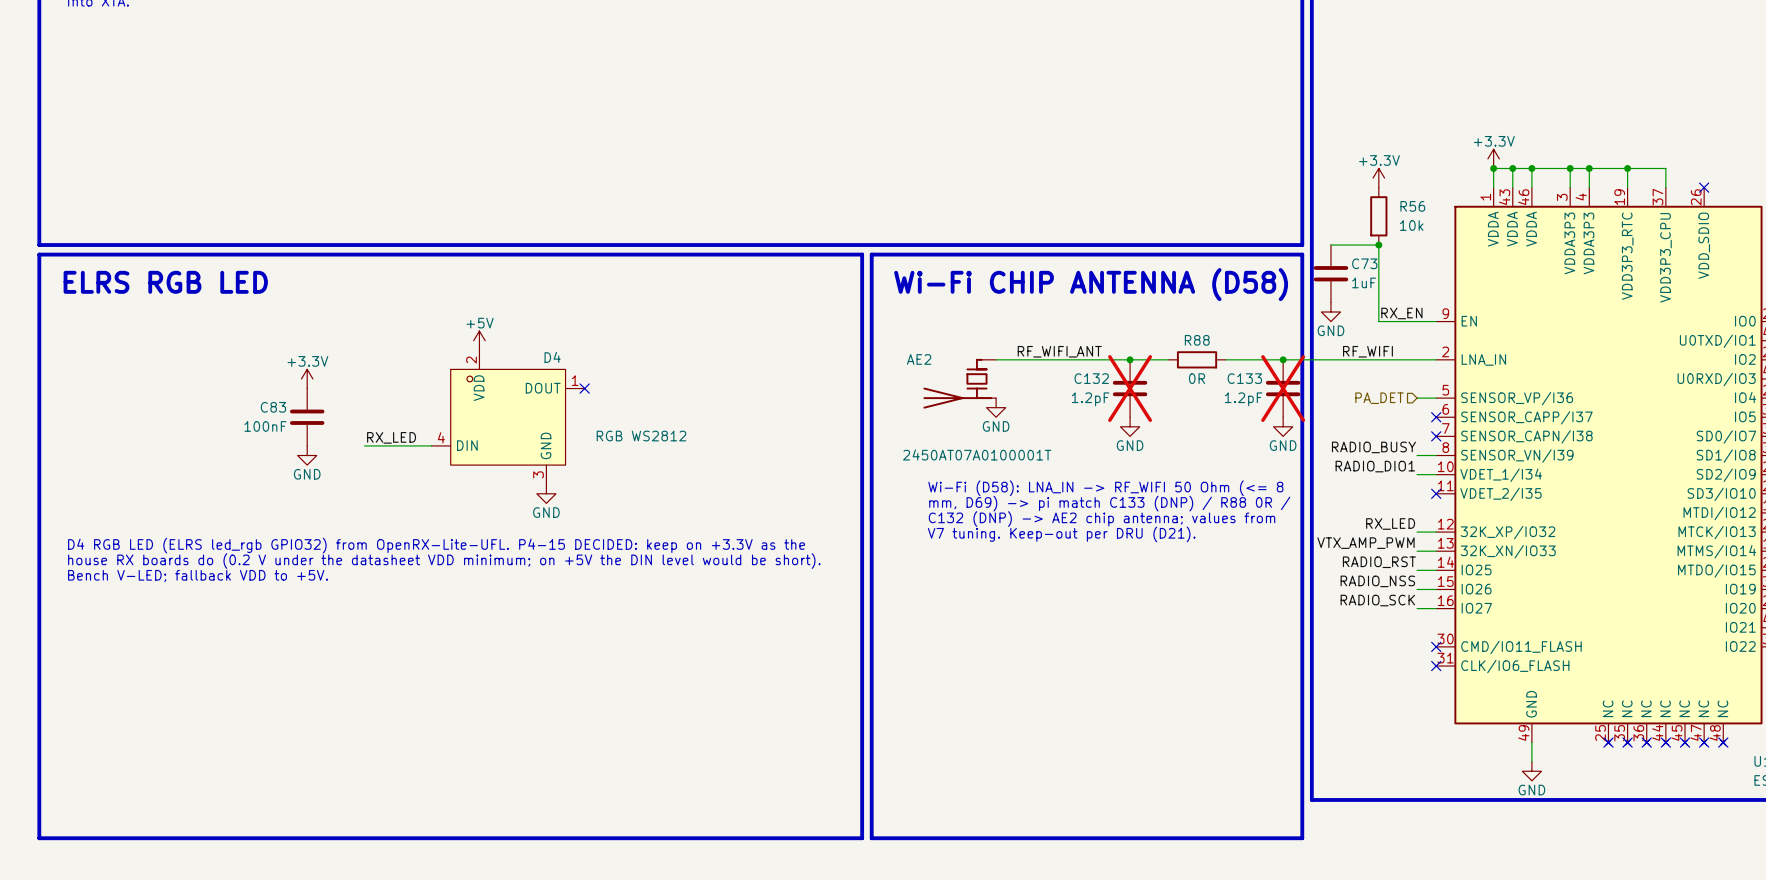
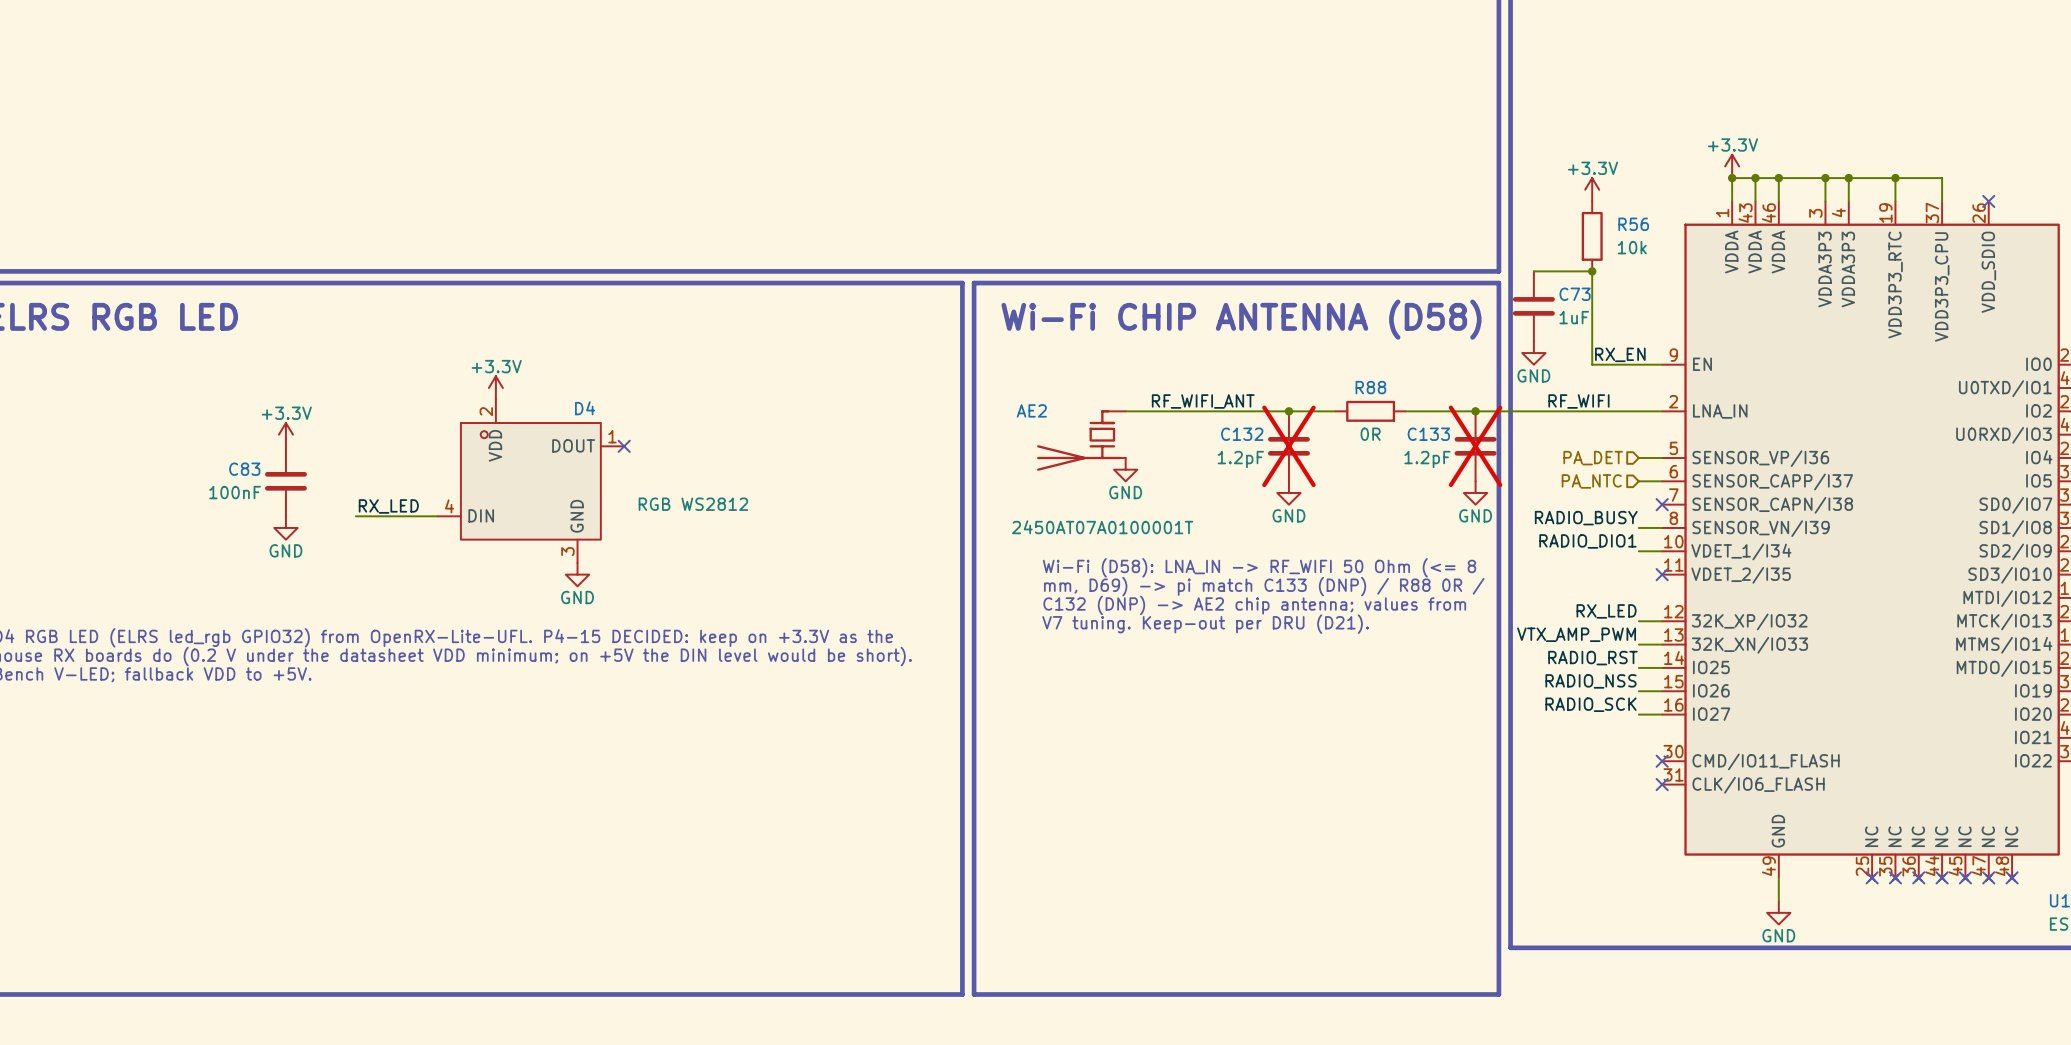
power symbol: +5V (479, 340) -> +3.3V (495, 388)
hierarchical label: none -> PA_NTC (1591, 481)
wire: none -> (1638, 481) (1662, 481)
no-connect mark: (1436, 417) -> none

